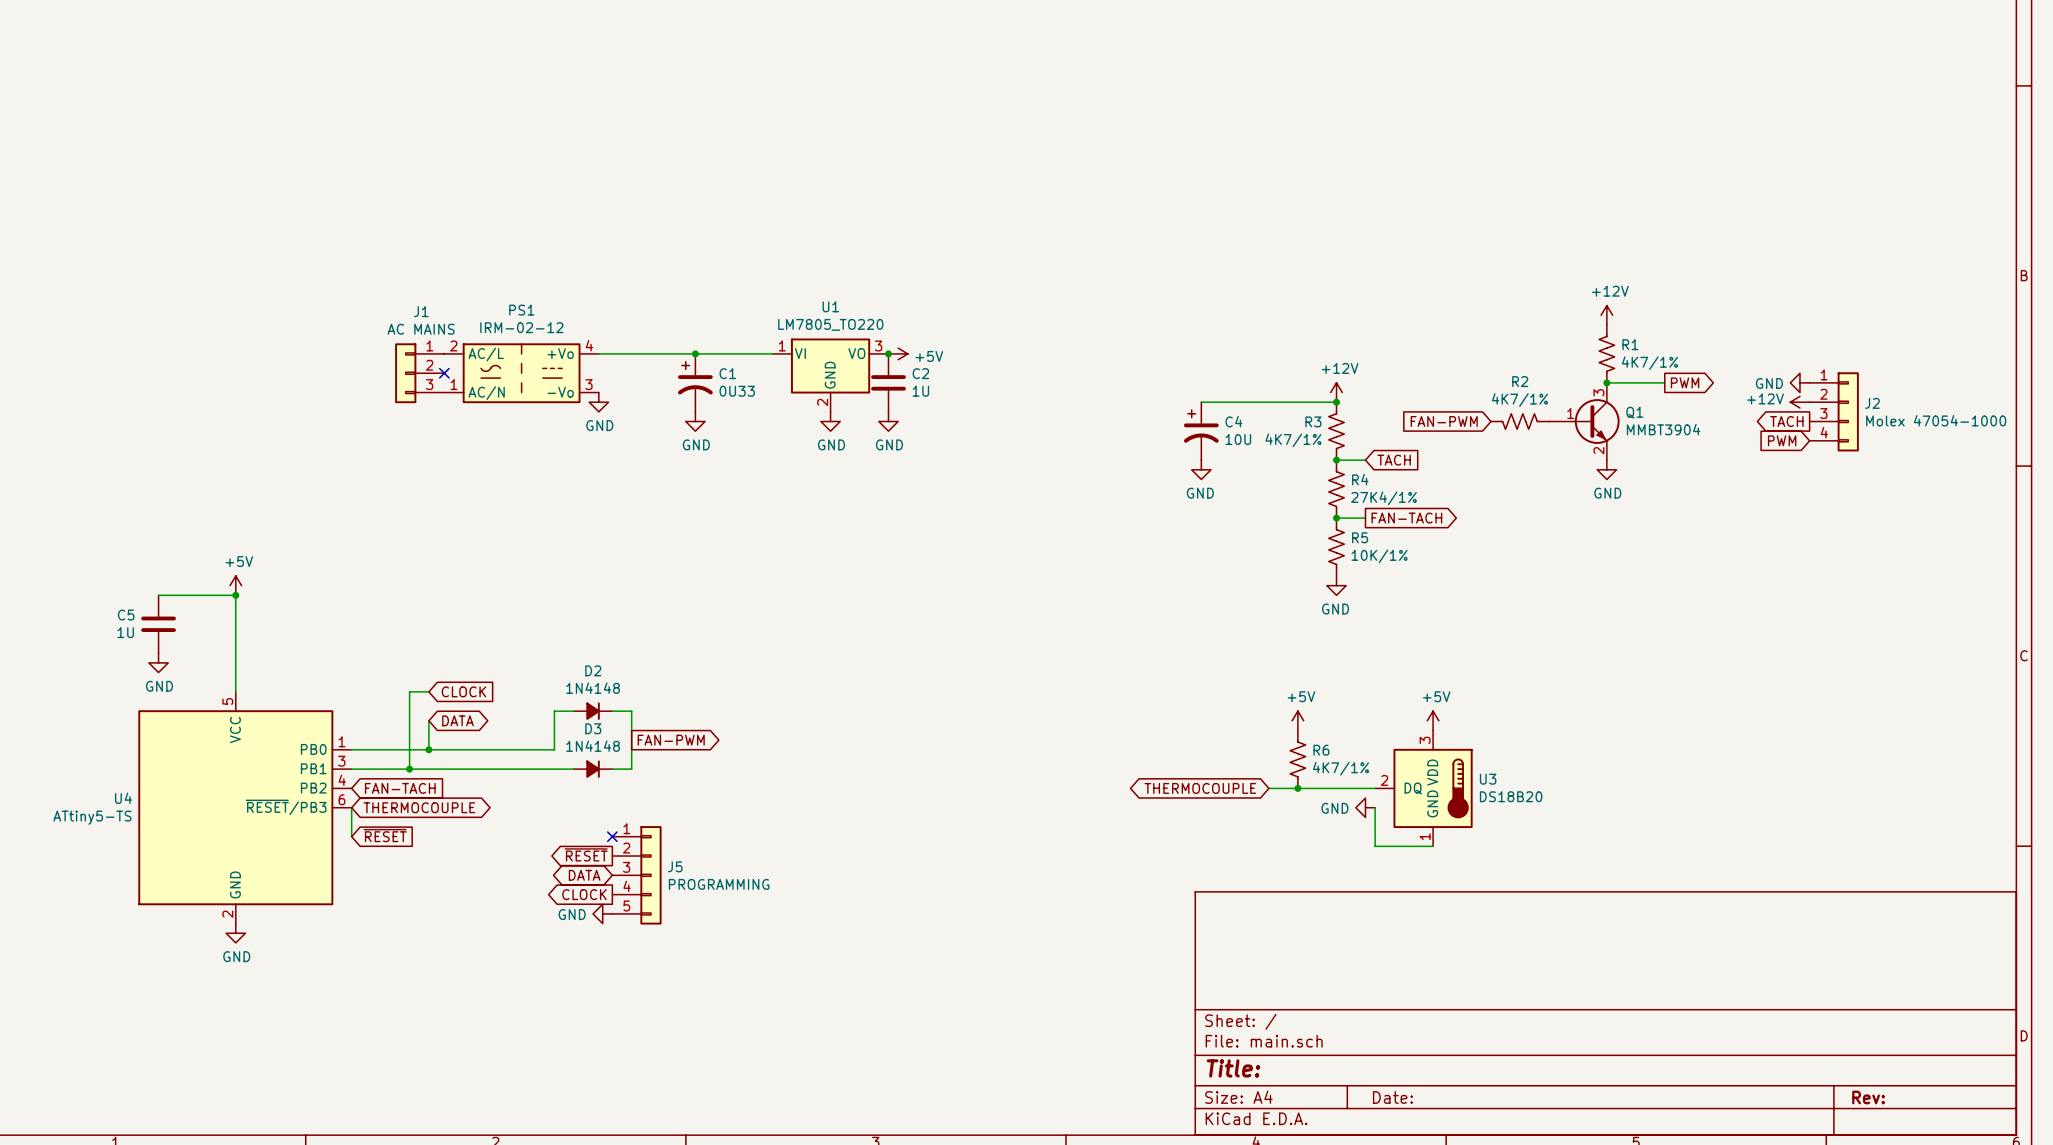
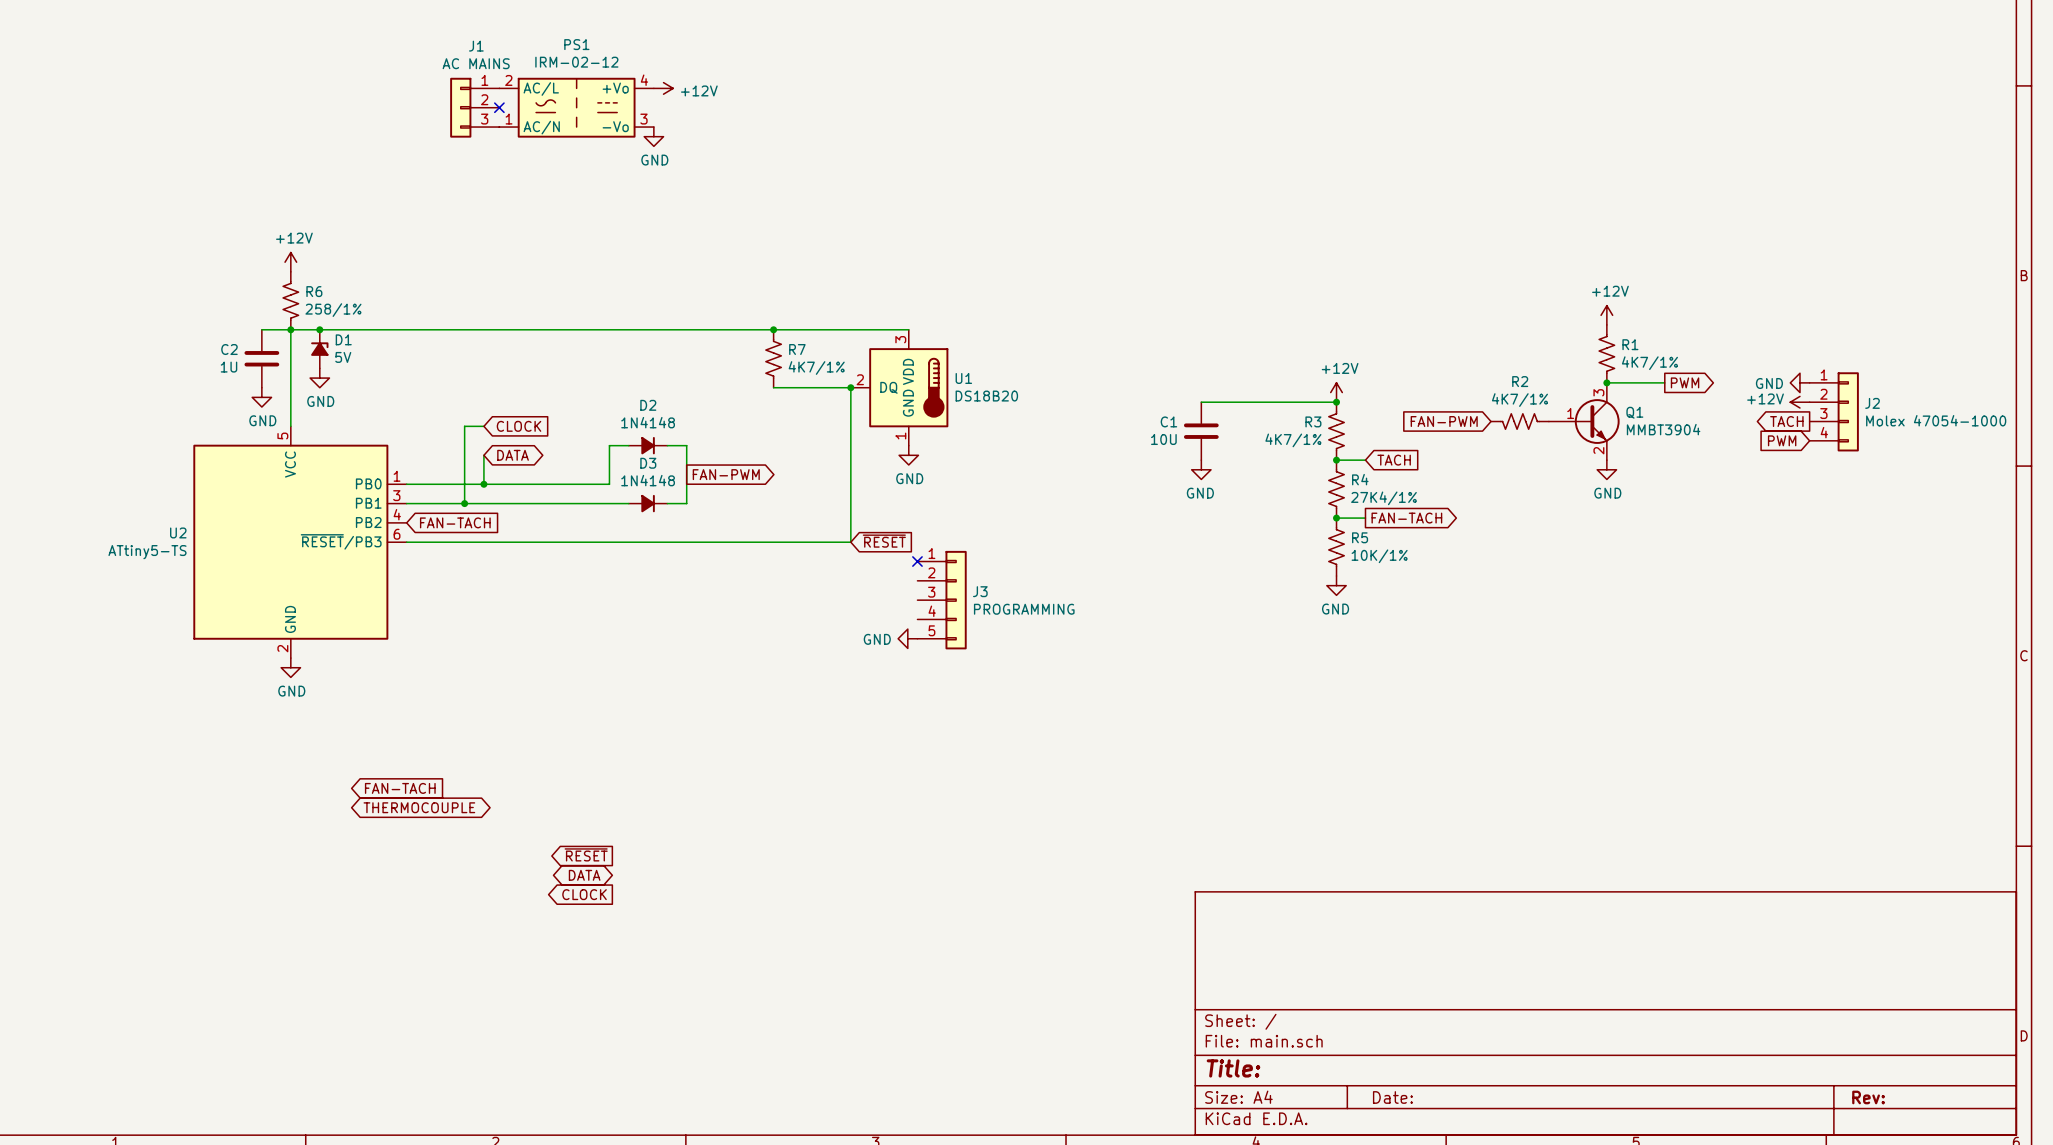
power symbol: none -> +12V (663, 88)
no-connect mark: none -> (499, 107)
power symbol: none -> GND (653, 136)
power symbol: none -> +12V (290, 262)
U1 name position: U1 (830, 306) -> U1 (963, 378)
U1 value: LM7805_TO220 (830, 324) -> DS18B20 (986, 396)
wire: none -> (261, 329) (908, 329)
wire: none -> (290, 329) (290, 426)
junction: none -> (290, 329)
junction: none -> (319, 329)
junction: none -> (773, 329)
U1 symbol: [772, 338, 889, 412] -> [850, 329, 949, 446]
D1: none -> 5V (319, 349)
wire: (598, 353) (772, 353) -> none
C1 symbol: [678, 353, 713, 412] -> [1183, 402, 1219, 461]
junction: (695, 353) -> none
junction: (888, 353) -> none
power symbol: +5V (898, 353) -> none
R7: none -> 4K7/1% (773, 358)
J1 position: (419, 373) -> (474, 107)
no-connect mark: (444, 373) -> none
PS1 position: (521, 373) -> (576, 107)
C1 name position: C1 (727, 373) -> C1 (1168, 421)
C2 name position: C2 (920, 373) -> C2 (229, 349)
power symbol: none -> GND (319, 378)
C2 position: (888, 382) -> (261, 358)
wire: none -> (773, 387) (850, 387) (850, 542) (406, 542)
junction: none -> (850, 387)
C1 value: 0U33 (737, 391) -> 10U (1163, 439)
C2 value position: 1U (920, 391) -> 1U (229, 367)
power symbol: none -> GND (261, 397)
power symbol: GND (598, 402) -> none
power symbol: GND (695, 421) -> none
power symbol: GND (830, 421) -> none
power symbol position: GND (888, 421) -> GND (908, 455)
wire: none -> (483, 426) (464, 426) (464, 503)
global label: none -> CLOCK (519, 426)
C4: 10U (1201, 431) -> none
wire: none -> (628, 445) (609, 445) (609, 484) (406, 484)
wire: none -> (667, 445) (686, 445) (686, 503) (667, 503)
wire: none -> (483, 455) (483, 484)
global label: none -> DATA (513, 455)
global label: none -> FAN-PWM (726, 474)
junction: none -> (483, 484)
wire: none -> (406, 503) (628, 503)
junction: none -> (464, 503)
global label: none -> FAN-TACH (455, 522)
global label: none -> ~{RESET} (884, 541)
U2: none -> ATtiny5-TS (300, 542)
no-connect mark: none -> (917, 561)
power symbol: +5V (235, 585) -> none
wire: (158, 595) (235, 595) (235, 691) -> none
junction: (235, 595) -> none
J3: none -> PROGRAMMING (942, 600)
C5: 1U (158, 624) -> none
power symbol: none -> GND (907, 638)
power symbol position: GND (158, 662) -> GND (290, 667)
wire: (428, 691) (409, 691) (409, 769) -> none
global label: CLOCK (463, 691) -> none
wire: (573, 711) (554, 711) (554, 749) (351, 749) -> none
D2 position: (593, 711) -> (648, 445)
wire: (612, 711) (631, 711) (631, 769) (612, 769) -> none
wire: (428, 720) (428, 749) -> none
global label: DATA (458, 720) -> none
power symbol: +5V (1297, 720) -> none
power symbol: +5V (1433, 720) -> none
global label: FAN-PWM (671, 740) -> none
junction: (428, 749) -> none
R6 flip: as is (1297, 759) -> left-right (290, 300)
R6 position: (1297, 759) -> (290, 300)
R6 value: 4K7/1% (1340, 768) -> 258/1% (333, 310)
wire: (351, 769) (573, 769) -> none
junction: (409, 769) -> none
D3 position: (593, 769) -> (648, 503)
global label: THERMOCOUPLE (1200, 788) -> none
wire: (1268, 788) (1375, 788) -> none
junction: (1297, 788) -> none
U3: DS18B20 (1423, 788) -> none
U4: ATtiny5-TS (244, 807) -> none
wire: (351, 807) (351, 836) -> none
power symbol: GND (1365, 807) -> none
wire: (1375, 807) (1375, 846) (1433, 846) -> none
global label: ~{RESET} (385, 835) -> none
no-connect mark: (612, 836) -> none
J5: PROGRAMMING (636, 875) -> none
power symbol: GND (602, 913) -> none
power symbol: GND (235, 933) -> none

